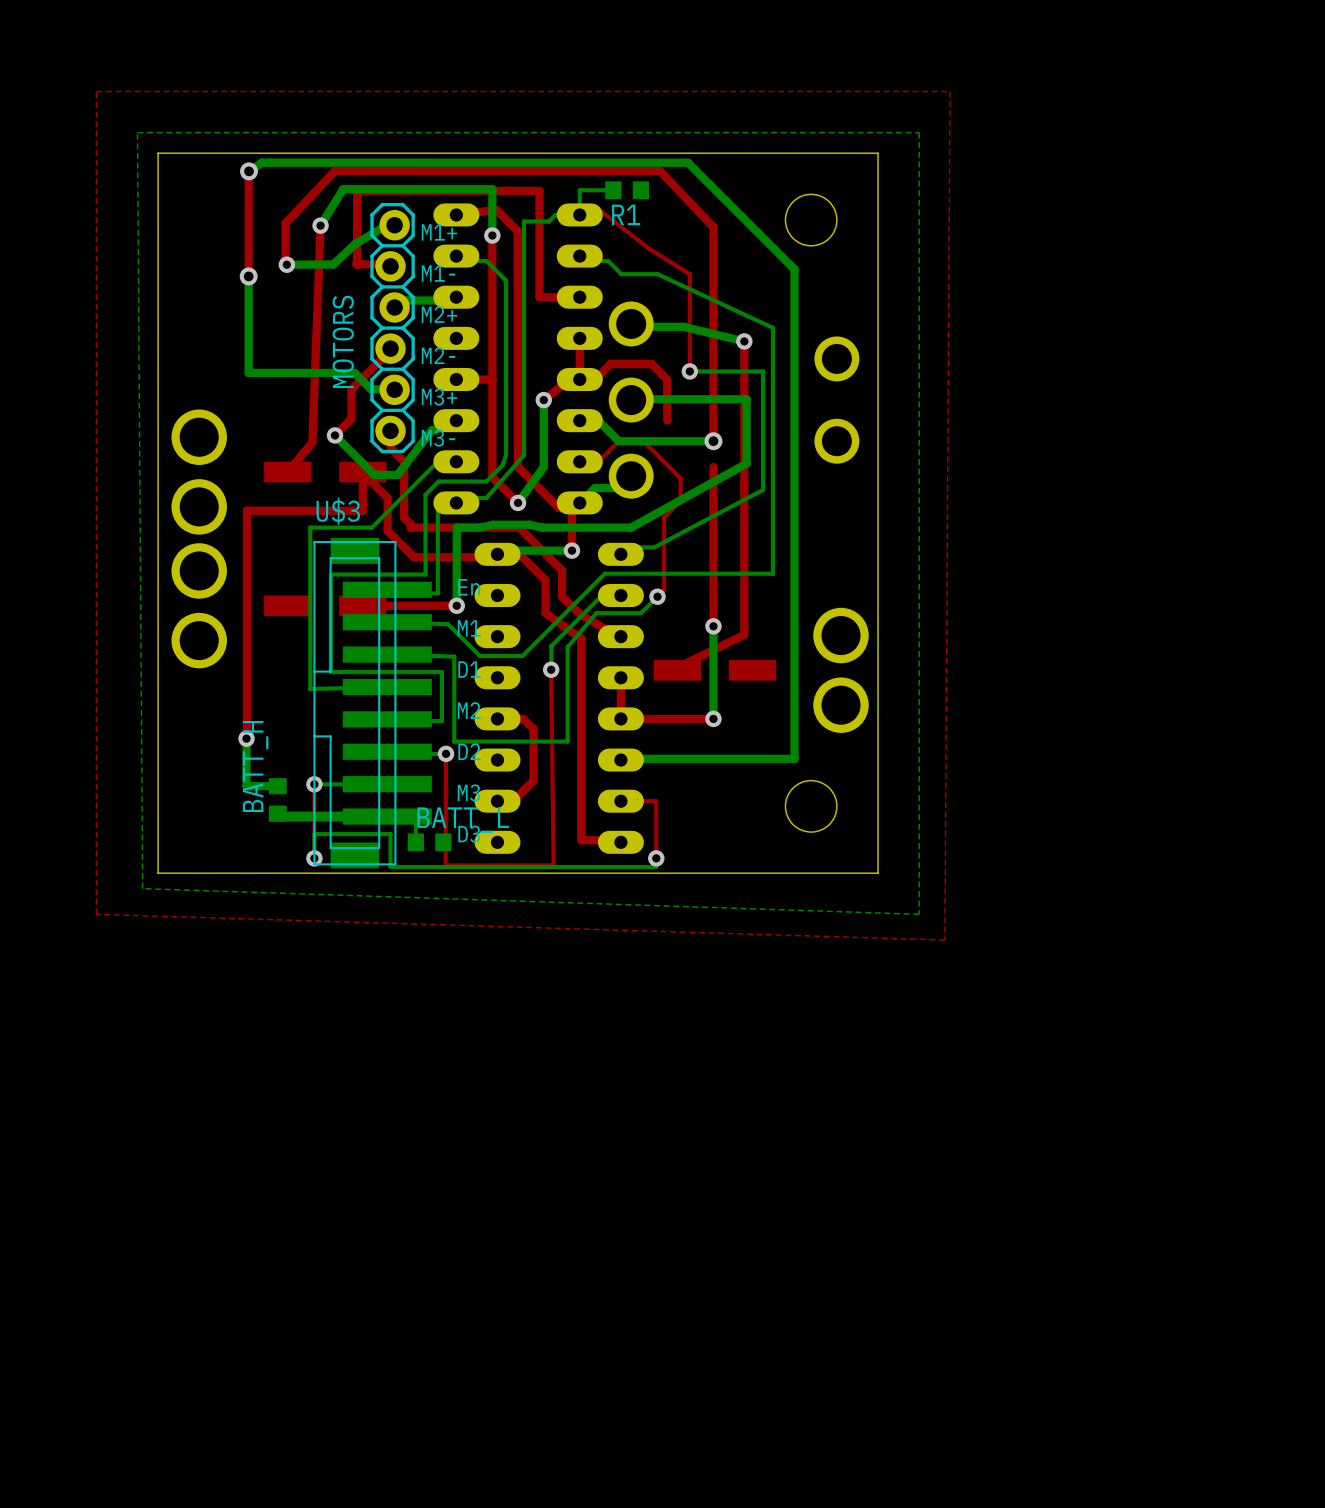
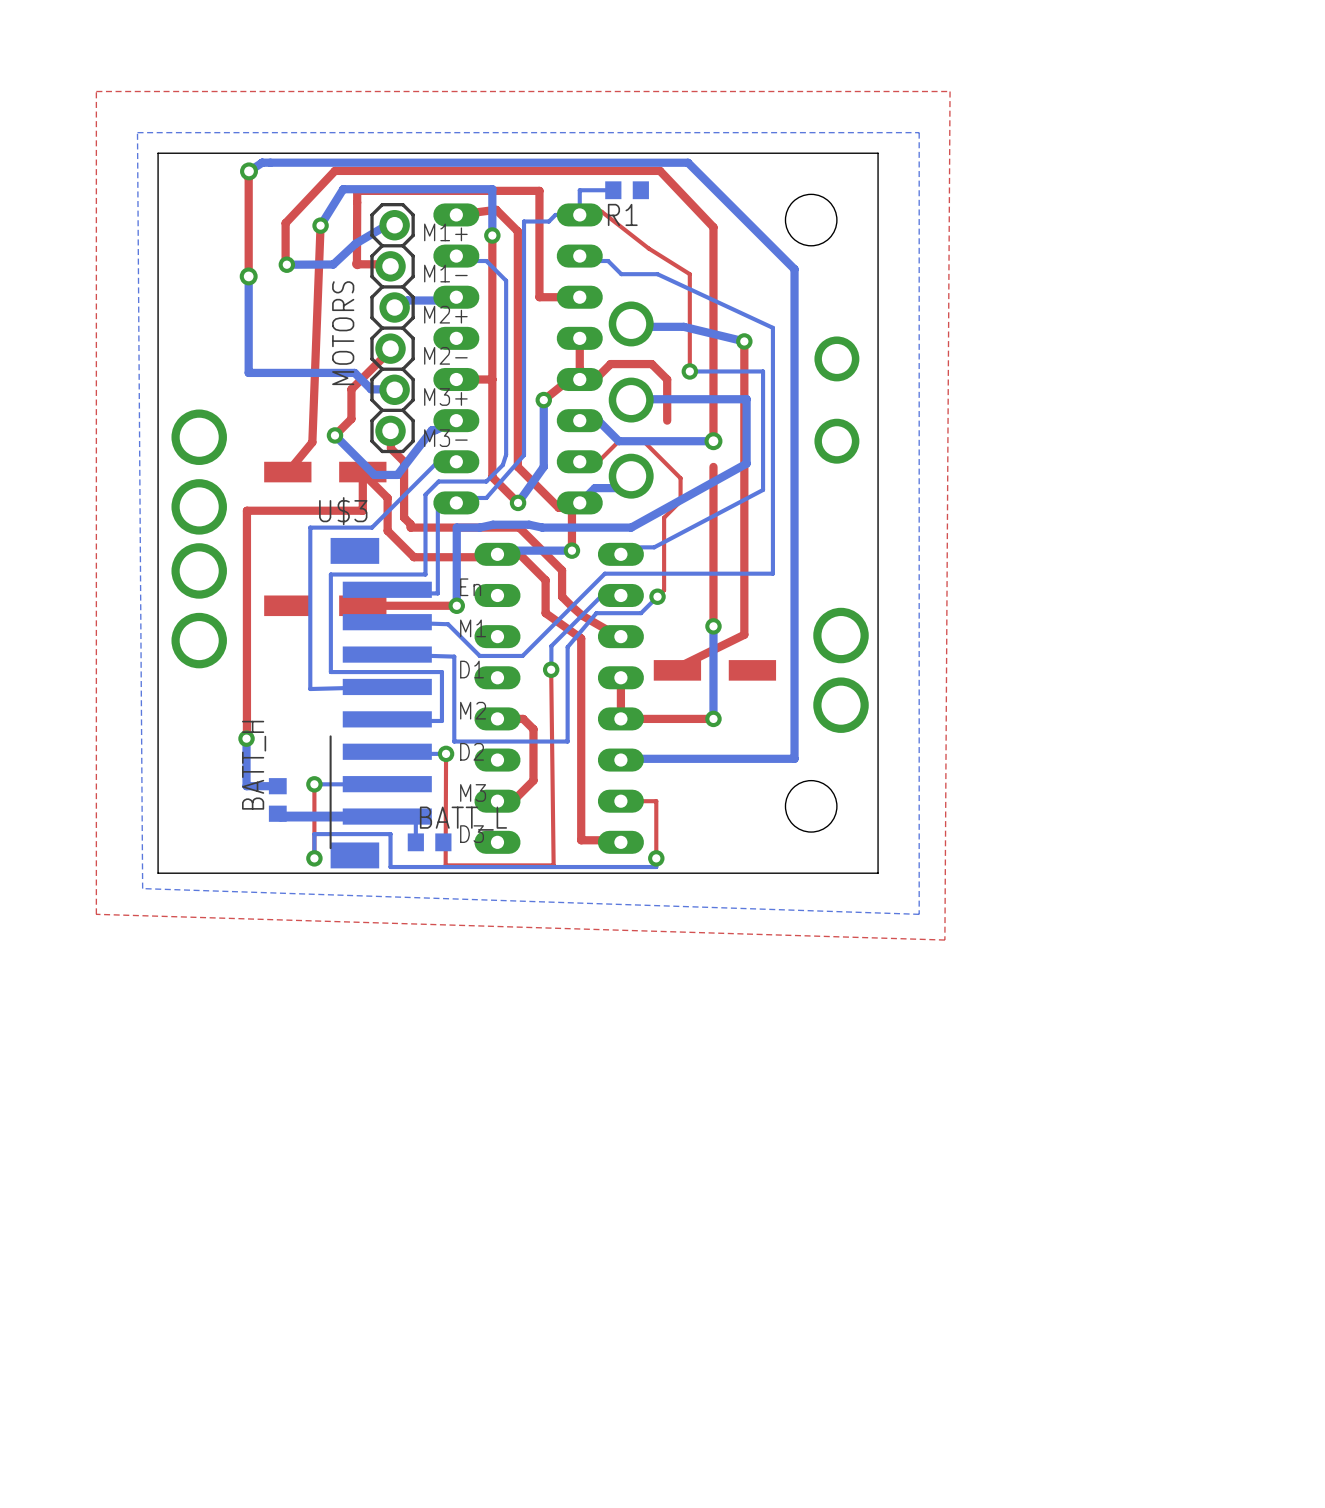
U$3 footprint: [313, 537, 432, 869] -> [329, 537, 432, 869]

